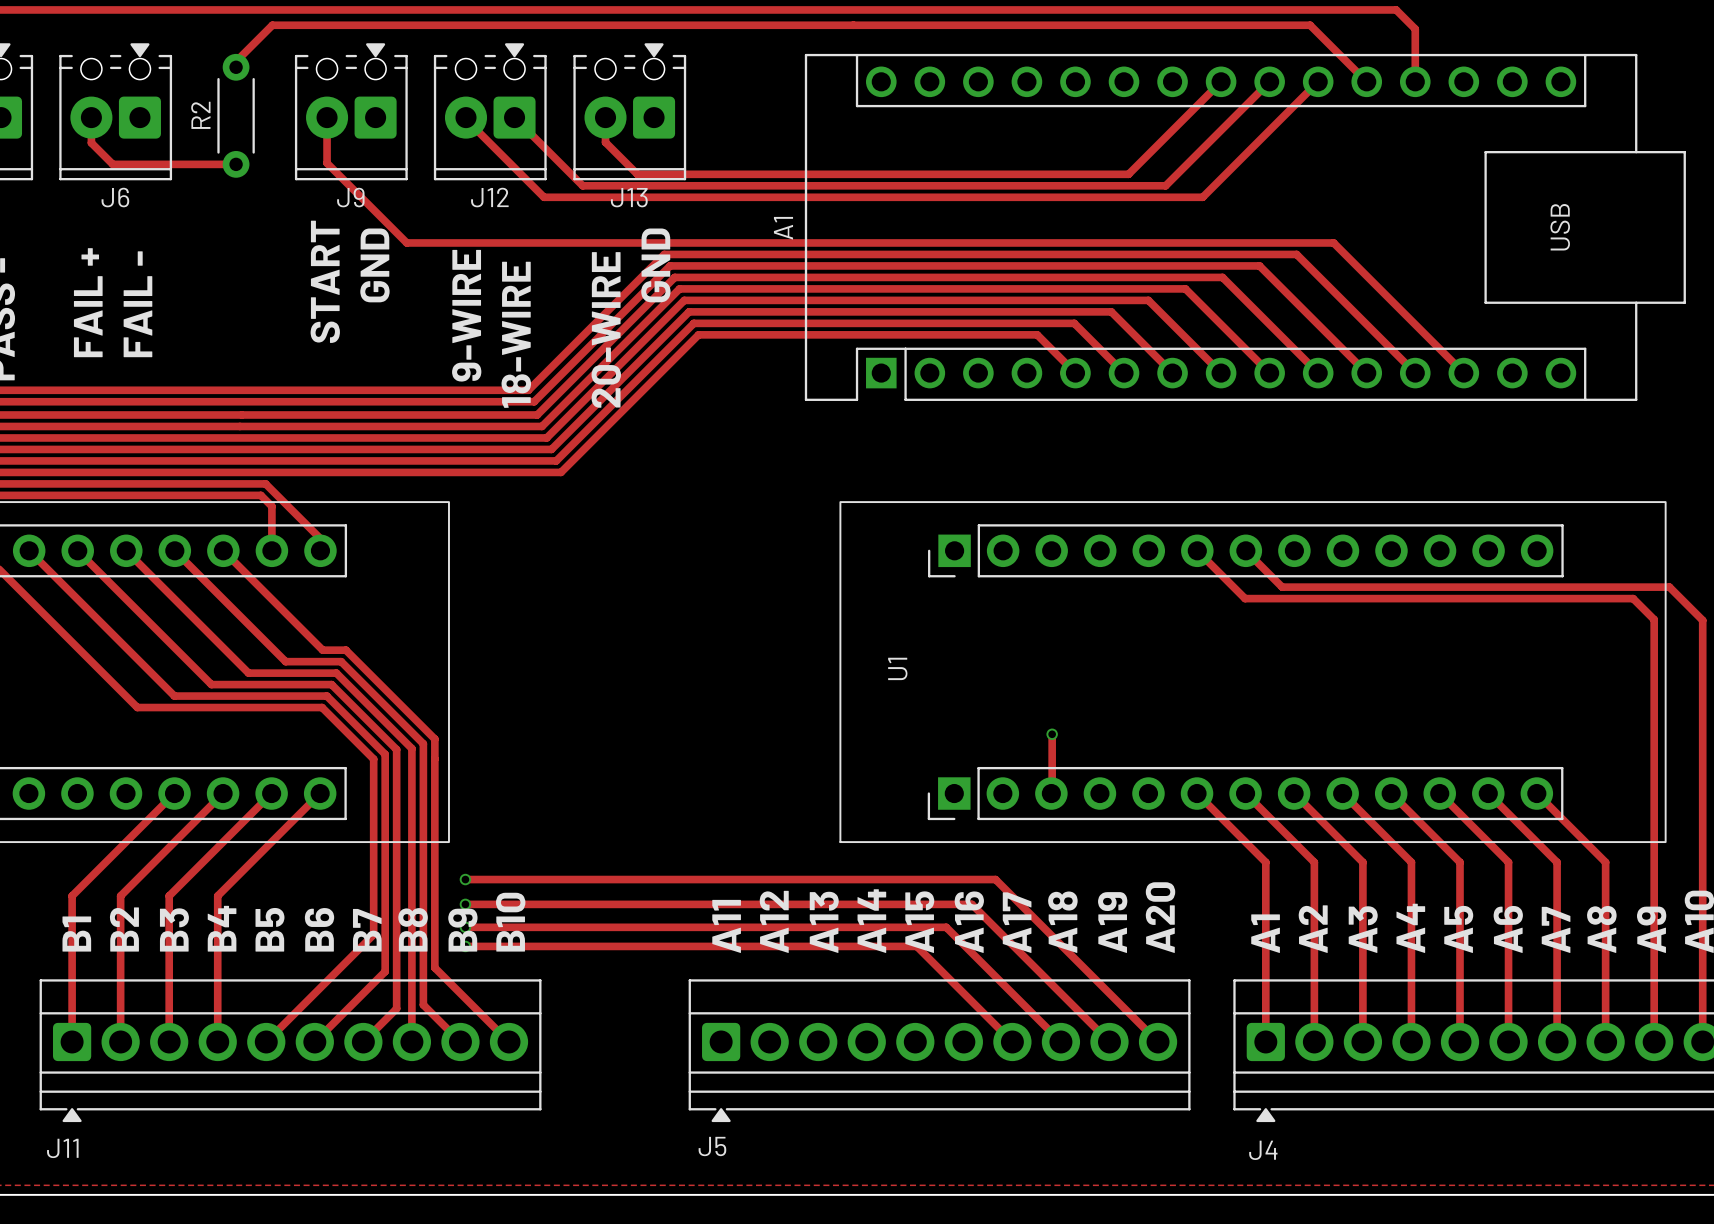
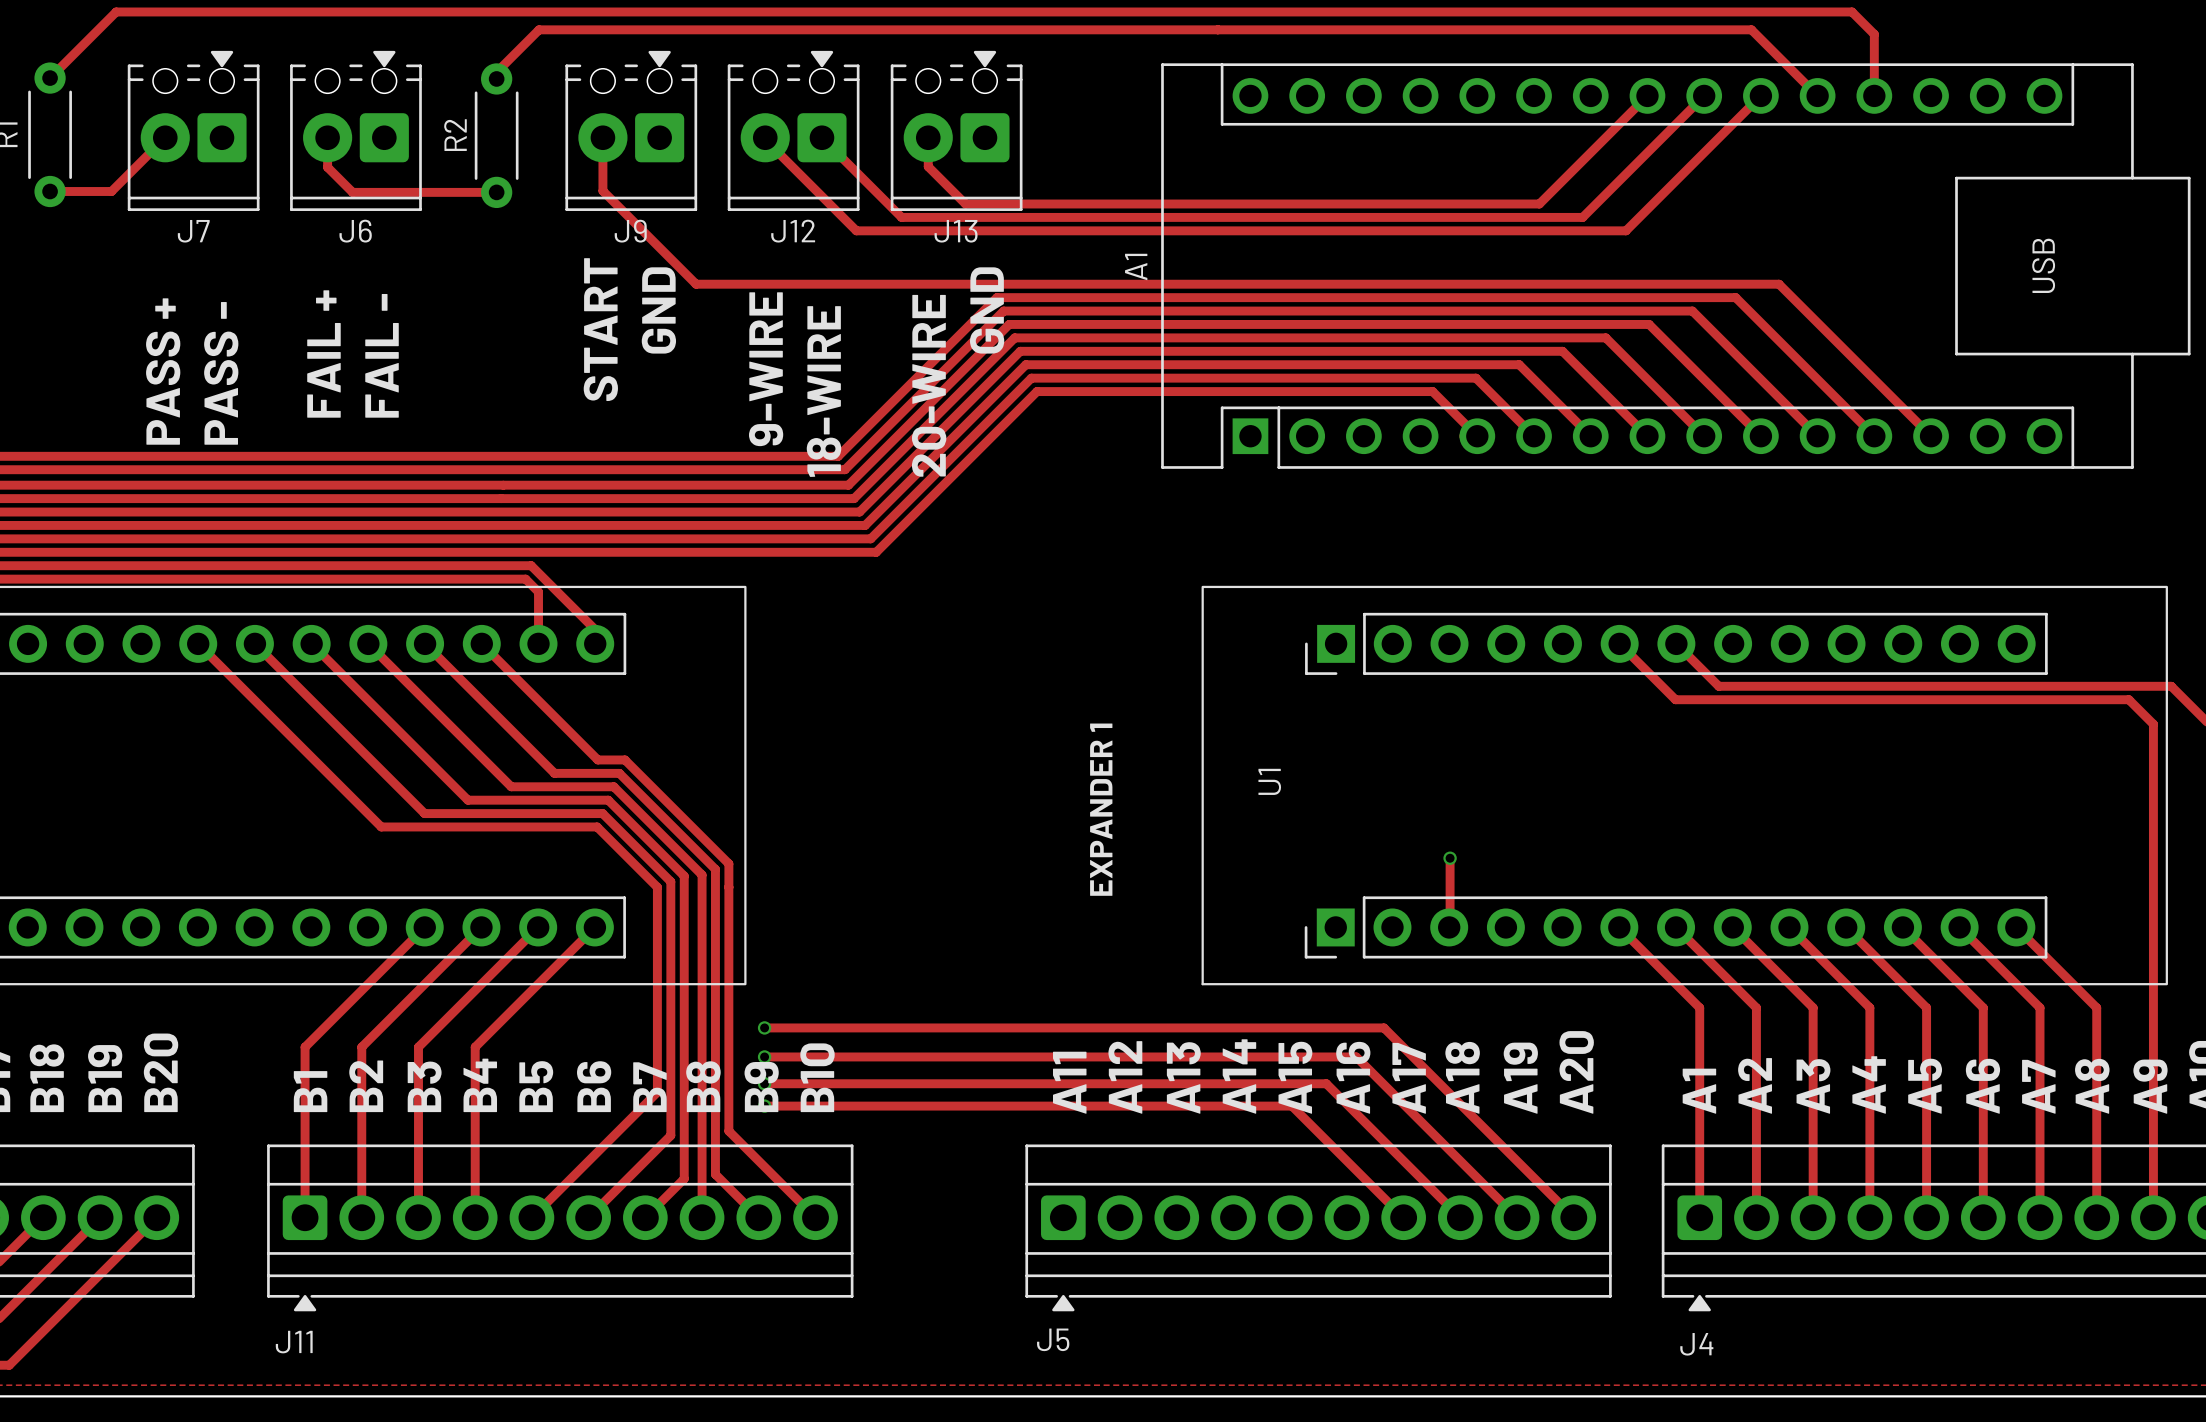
text: none -> EXPANDER 1 (1101, 809)

